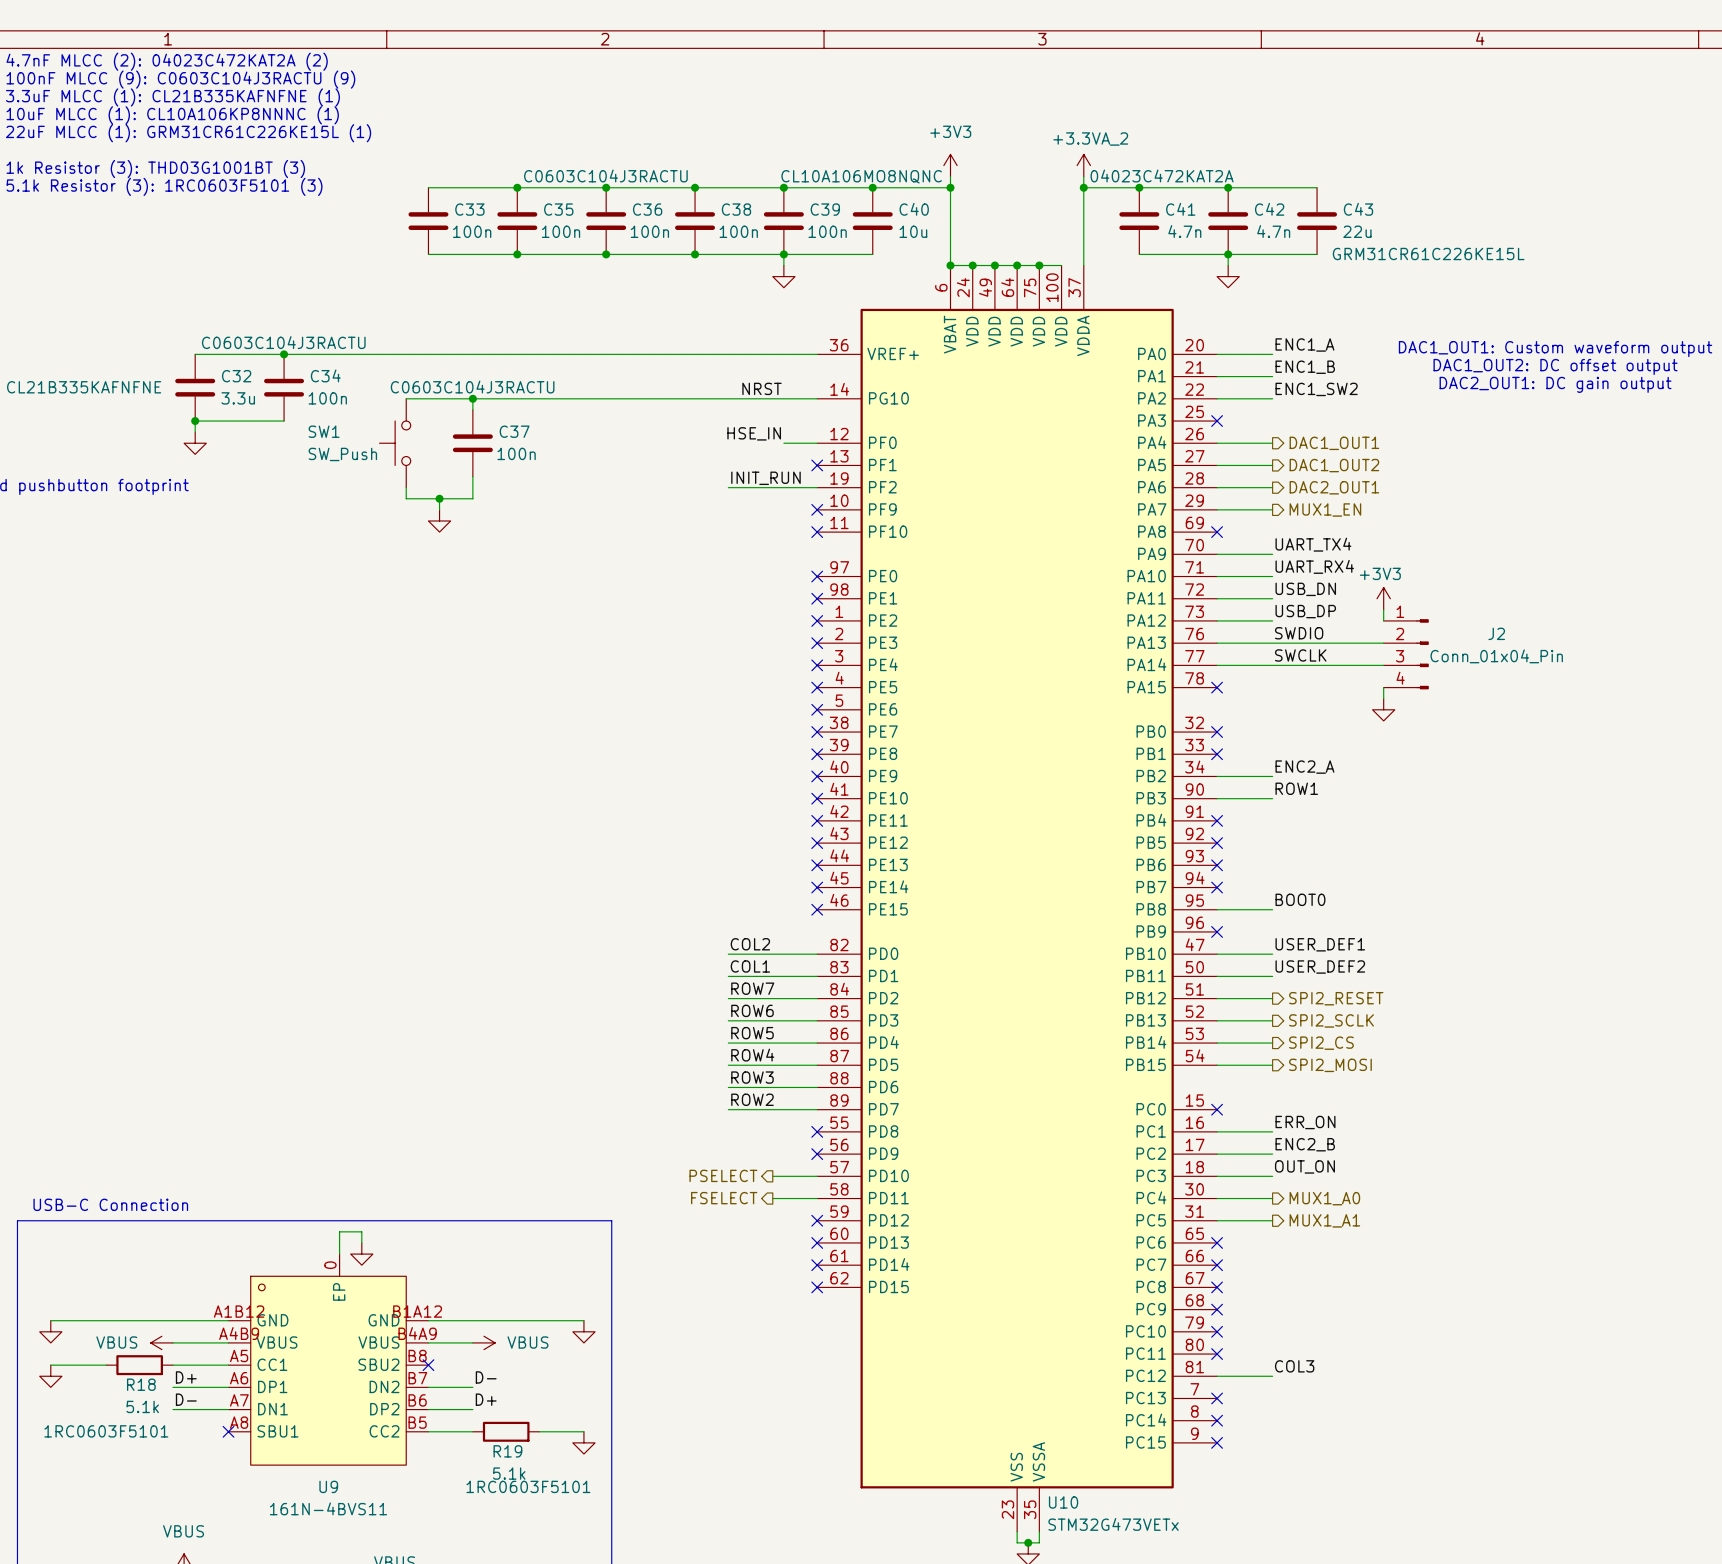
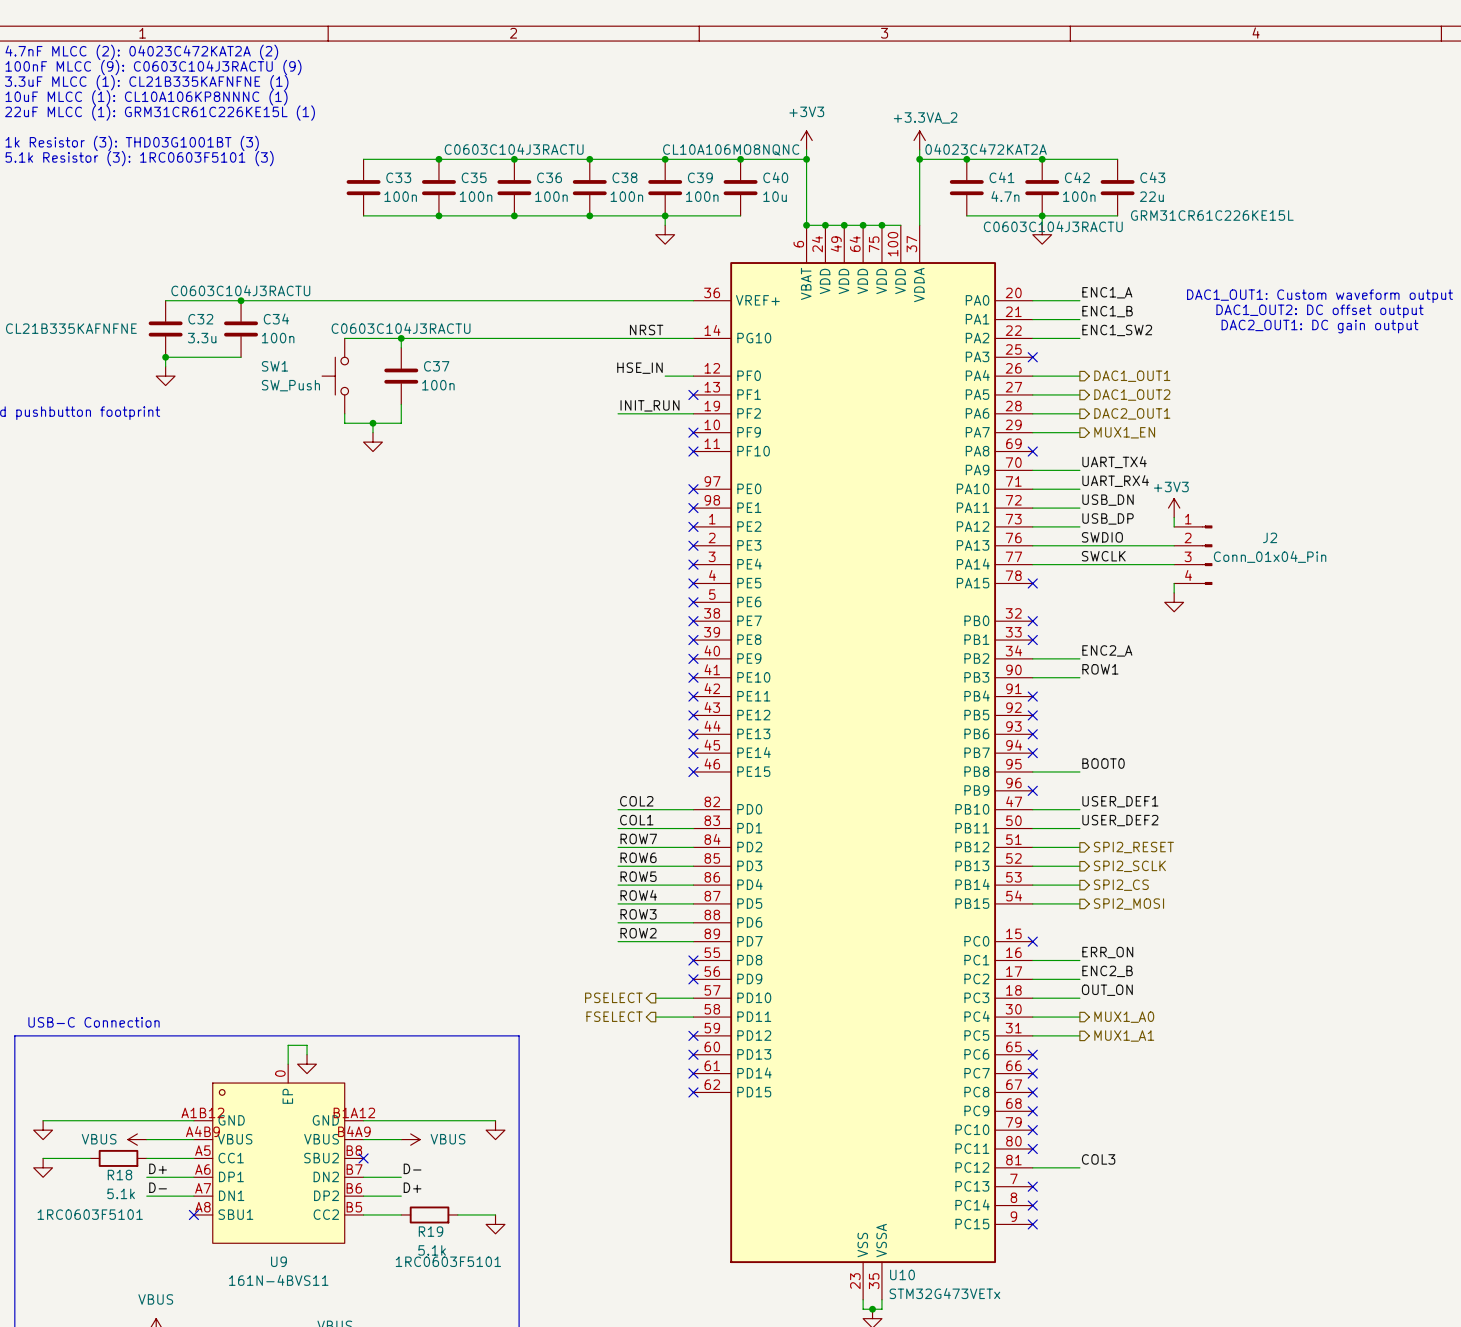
C42 value: 4.7n (1273, 231) -> 100n (1079, 196)
C42 text: none -> C0603C104J3RACTU (1053, 226)

